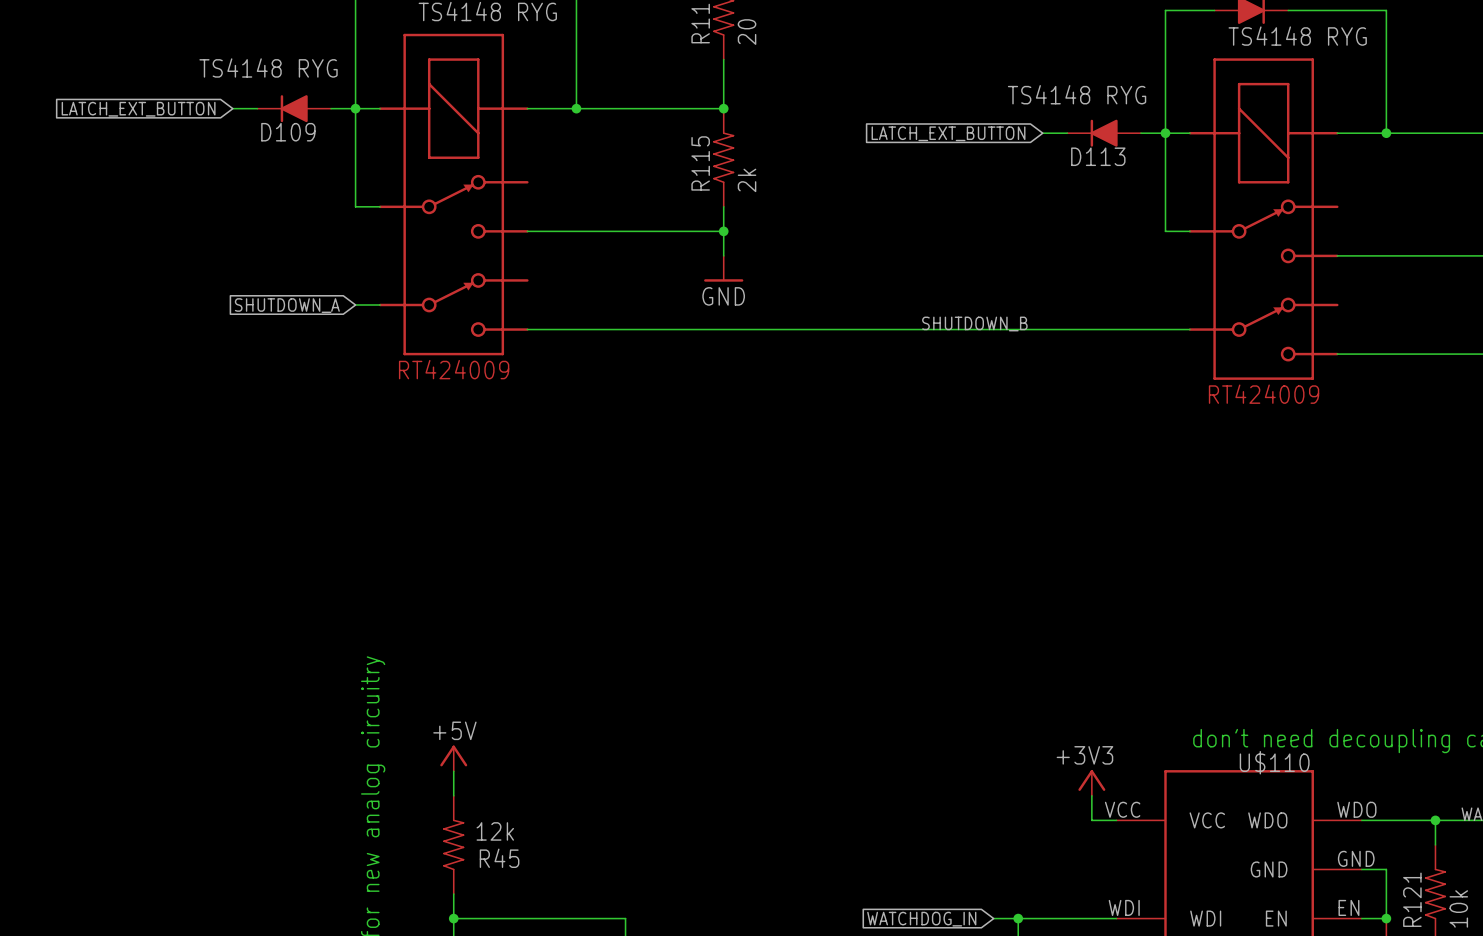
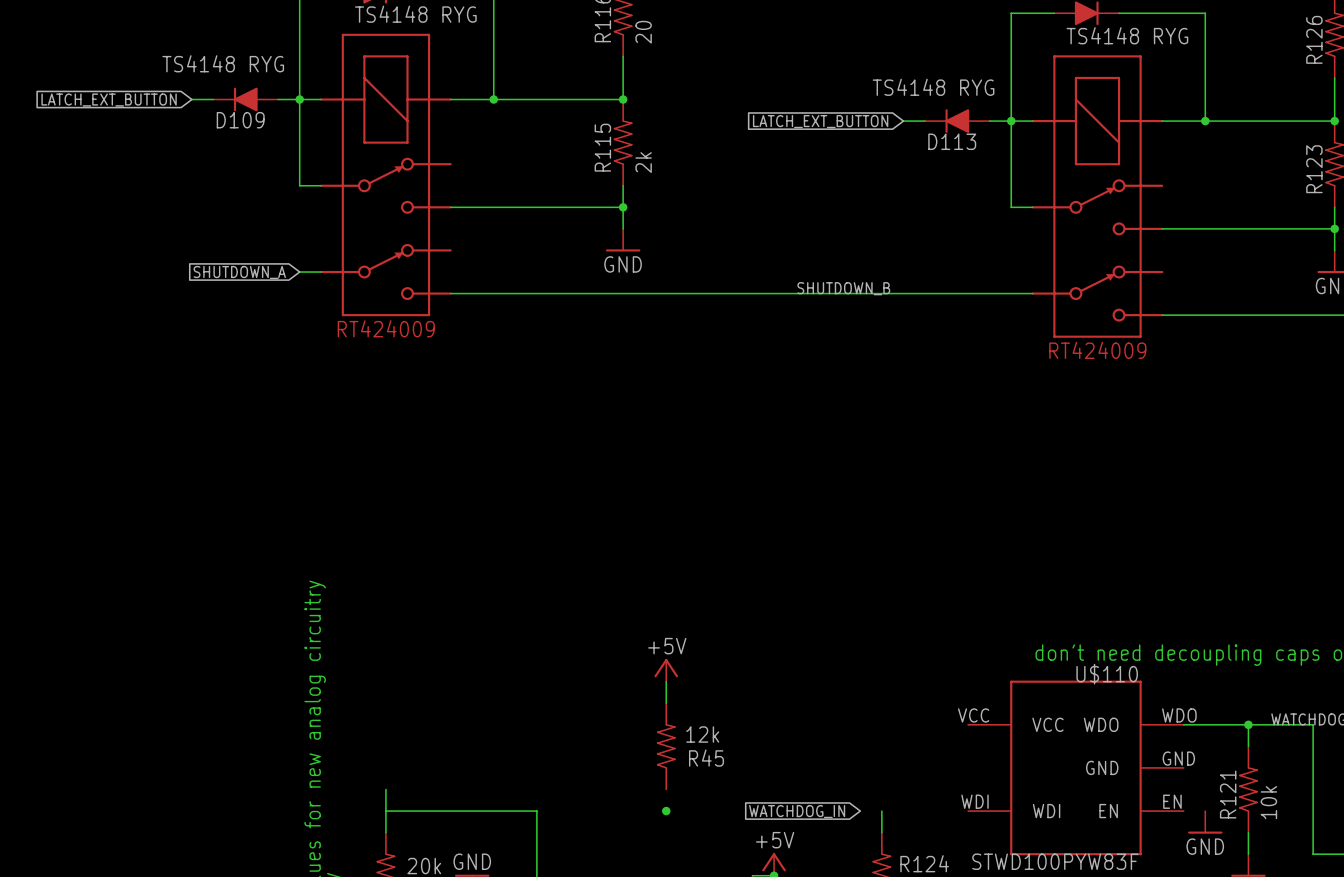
power symbol: +5V (453, 758) -> none
power symbol: none -> +5V (666, 670)
wire: (453, 771) (453, 795) -> none
wire: none -> (666, 681) (666, 703)
power symbol: +3V3 (1091, 782) -> none
wire: (1091, 795) (1091, 820) (1116, 820) -> none
R45 position: (453, 844) -> (666, 746)
wire: (1361, 869) (1386, 869) (1386, 918) (1361, 918) -> none
junction: (453, 918) -> none
junction: none -> (666, 811)
wire: (993, 918) (1116, 918) -> none
junction: (1018, 918) -> none
junction: (1386, 918) -> none

